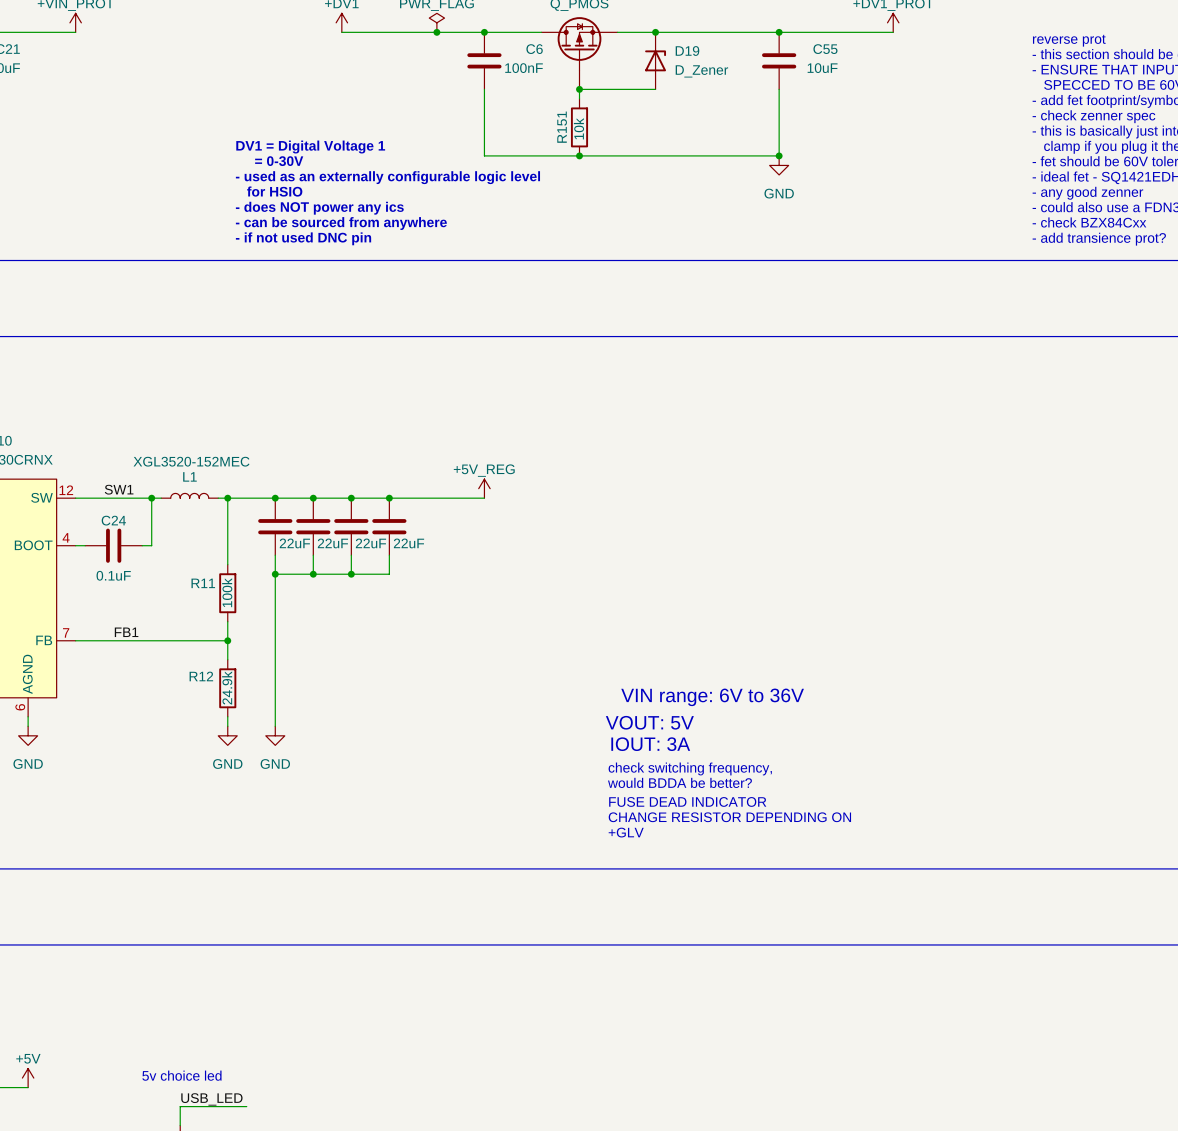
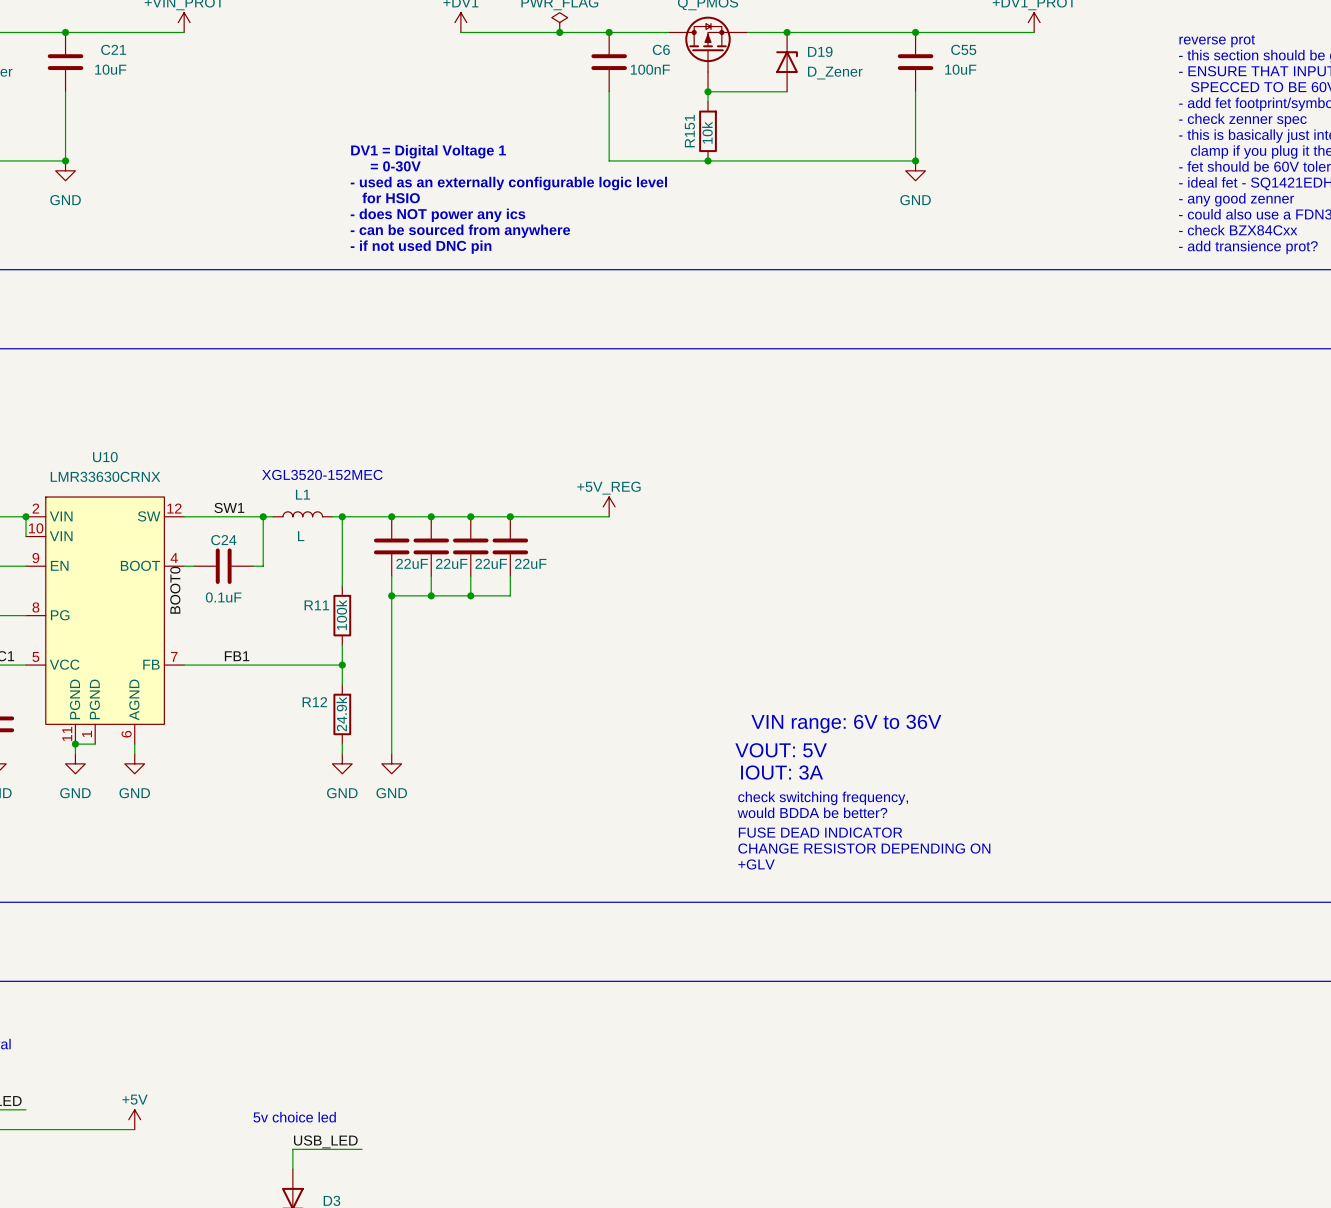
text: none -> XGL3520-152MEC (322, 474)
L1 value: XGL3520-152MEC (191, 461) -> L (301, 536)
label: none -> BOOT0 (175, 590)

